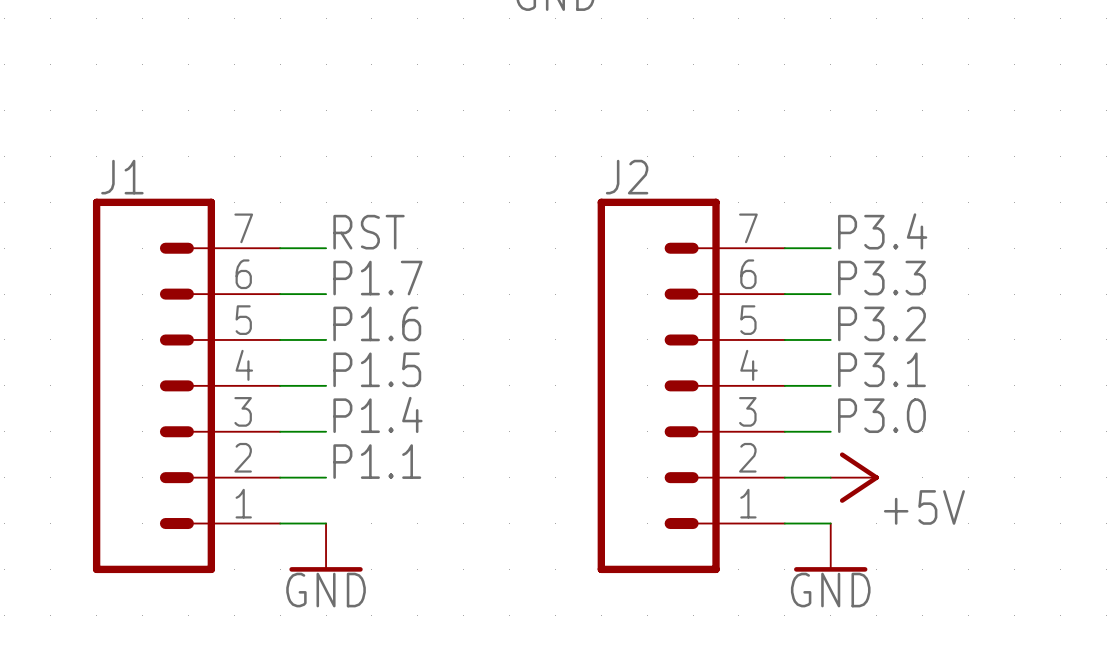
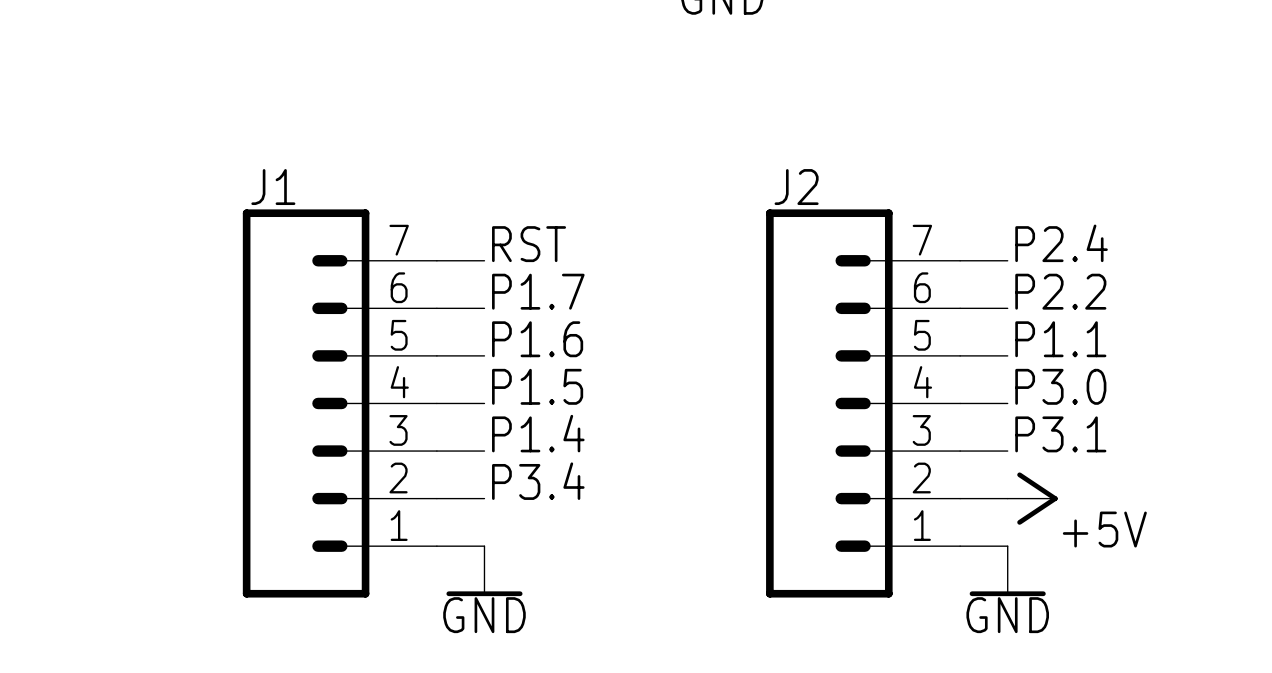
label: P3.4 (882, 231) -> P2.4 (1061, 243)
label: P3.3 (881, 278) -> P2.2 (1060, 291)
label: P3.2 (881, 323) -> P1.1 (1060, 339)
label: P3.1 (881, 369) -> P3.0 (1060, 386)
label: P3.0 (881, 415) -> P3.1 (1060, 434)
label: P1.1 (377, 461) -> P3.4 (538, 481)

